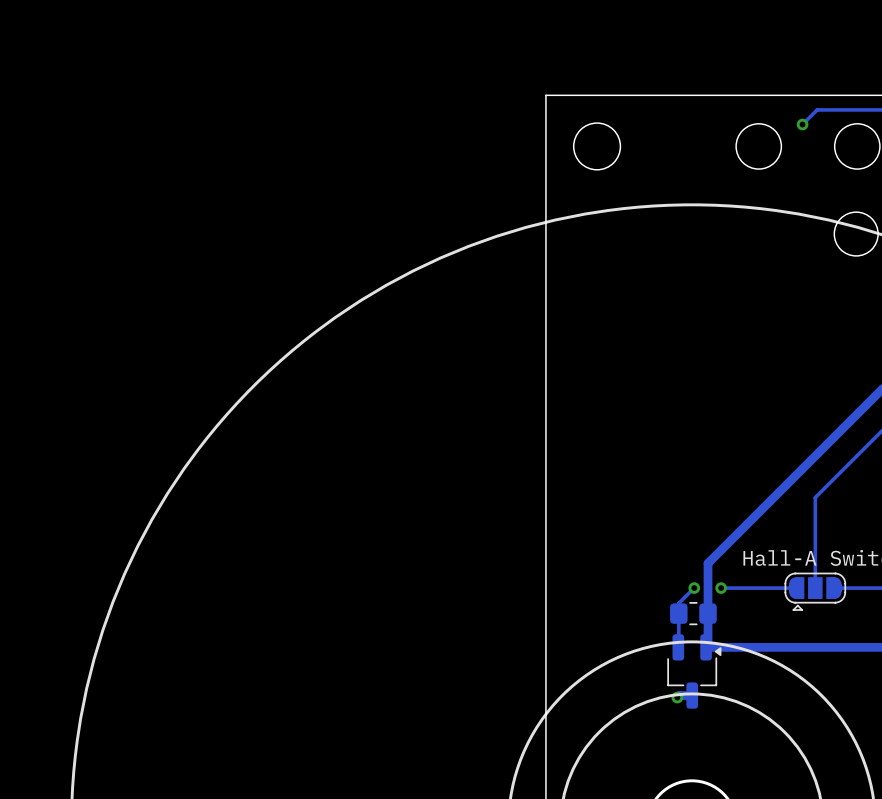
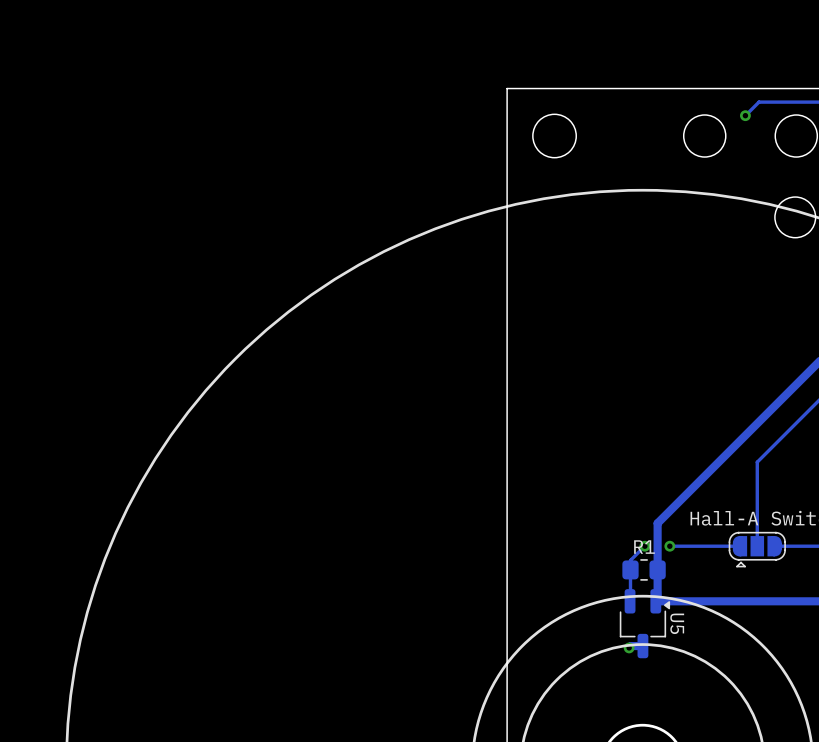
R1 name: none -> R1 (644, 547)
U5 name: none -> U5 (677, 623)

